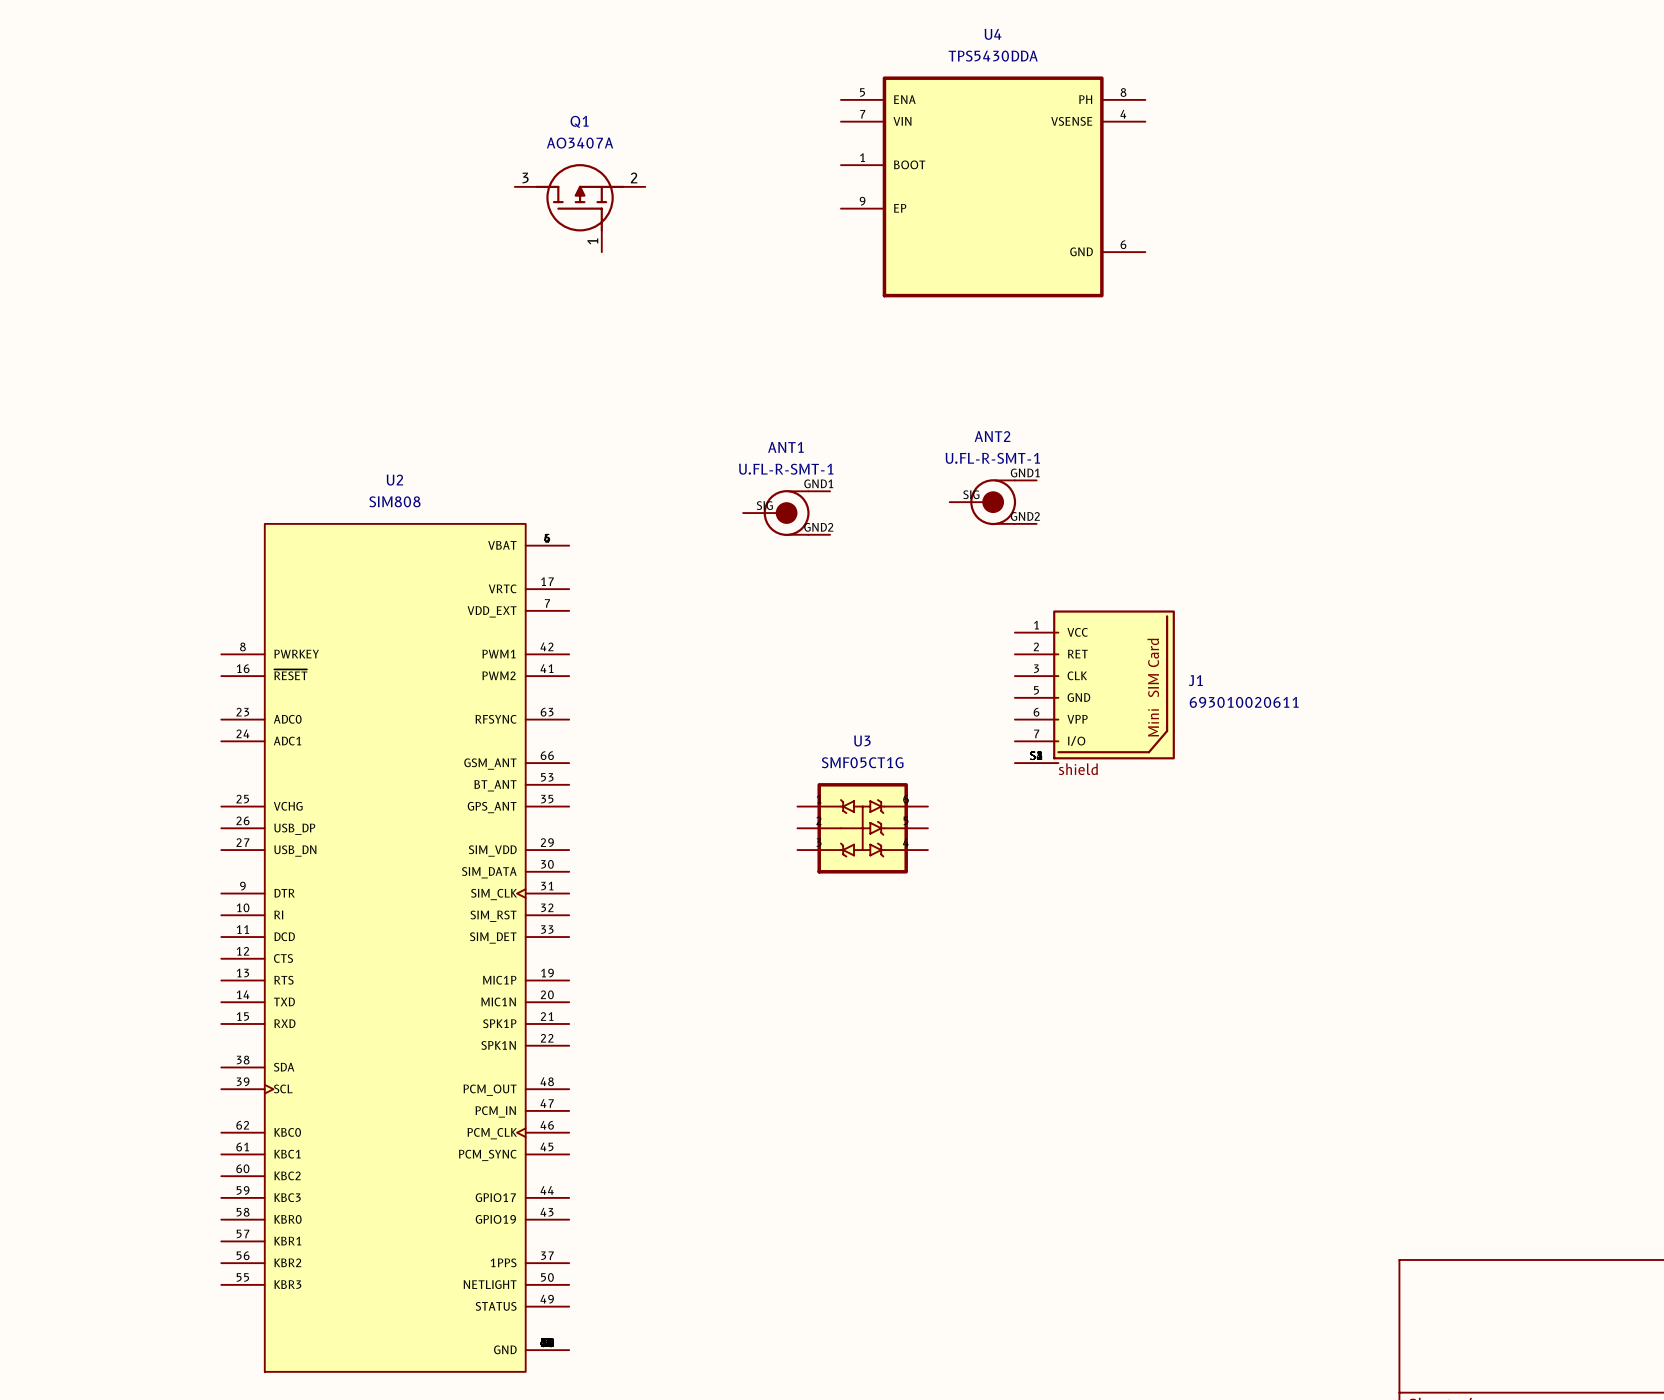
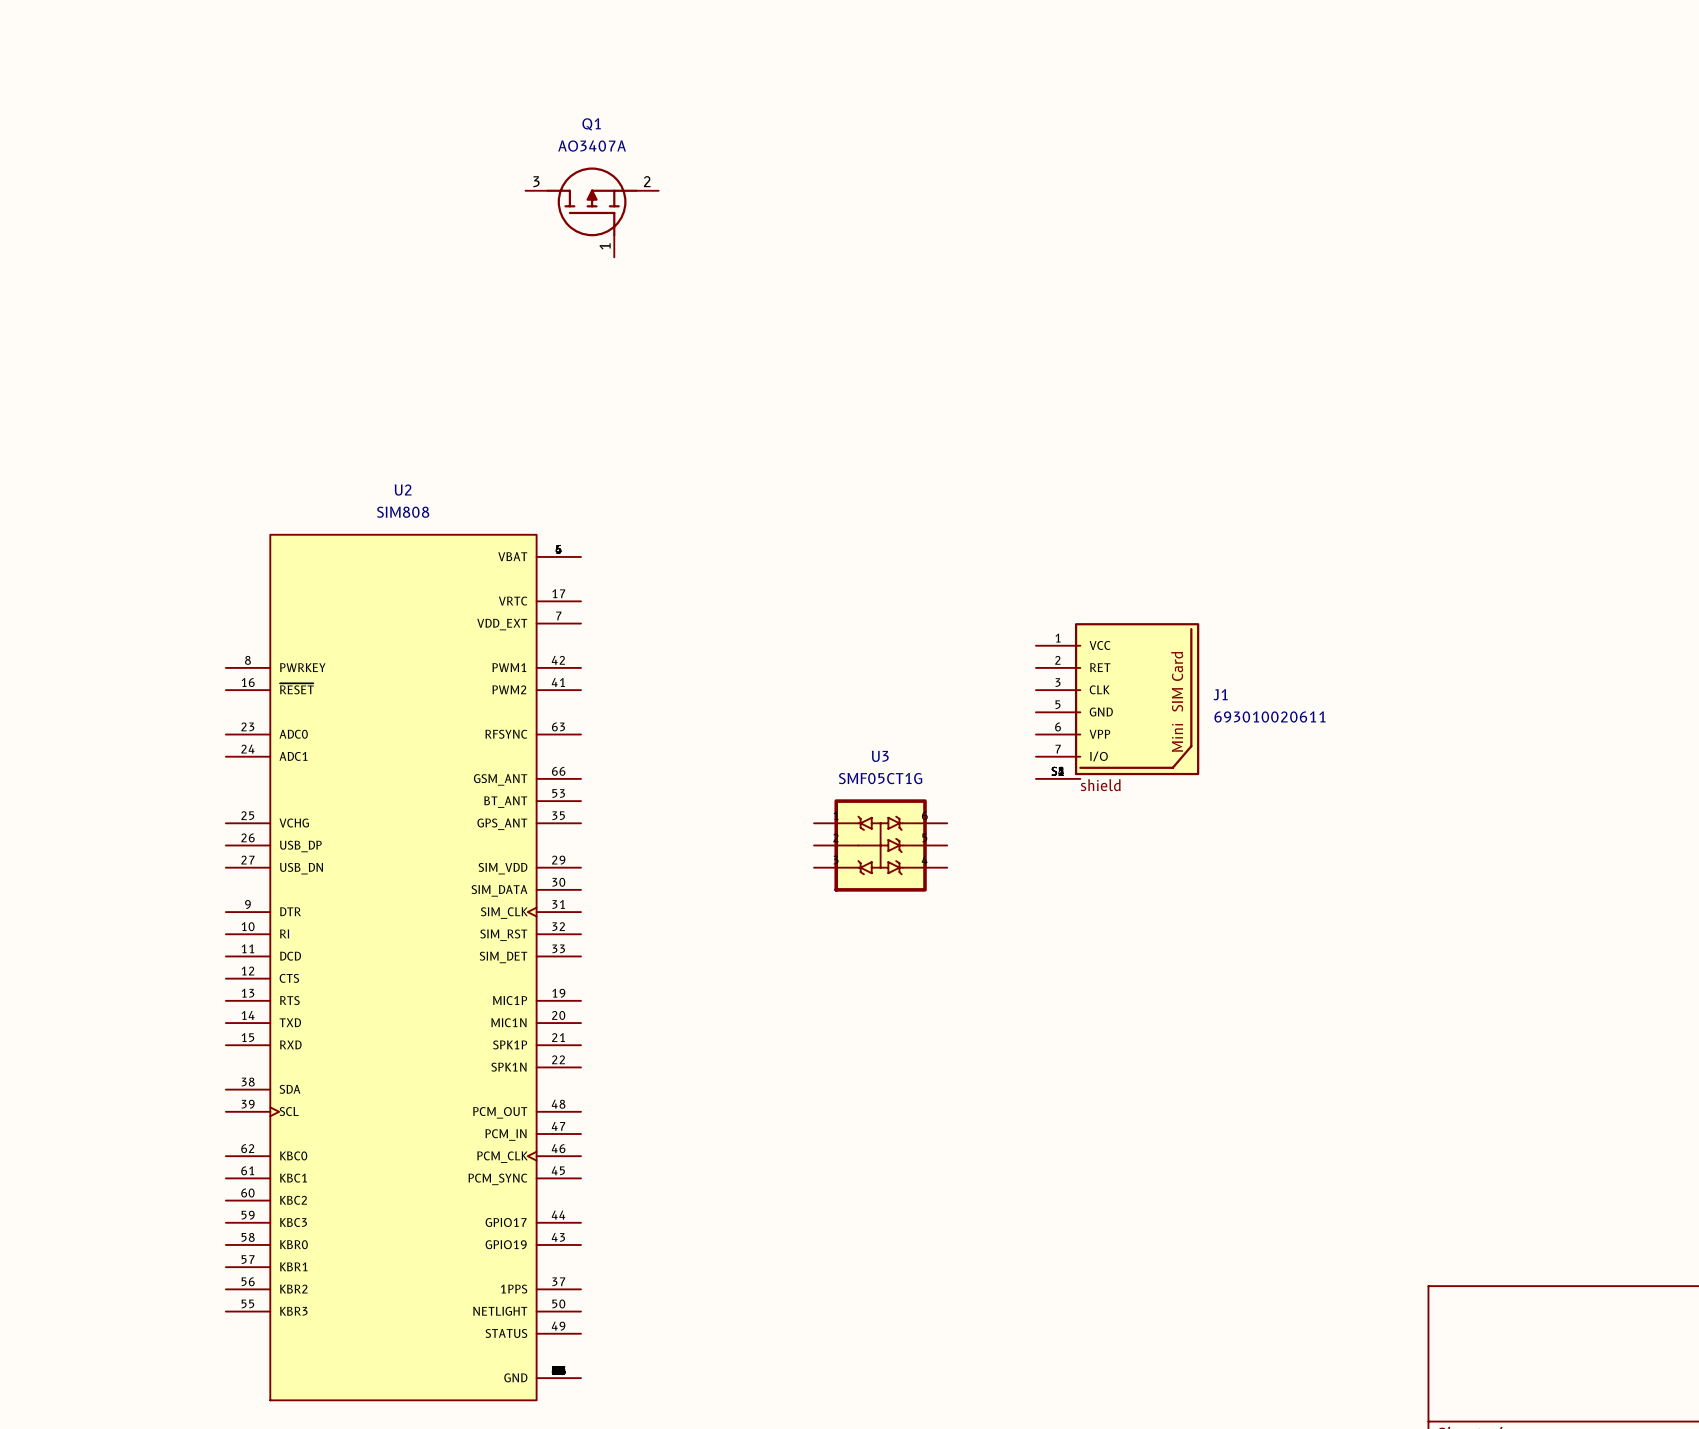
U4: TPS5430DDA (993, 186) -> none
ANT2: U.FL-R-SMT-1 (993, 502) -> none
ANT1: U.FL-R-SMT-1 (786, 513) -> none

